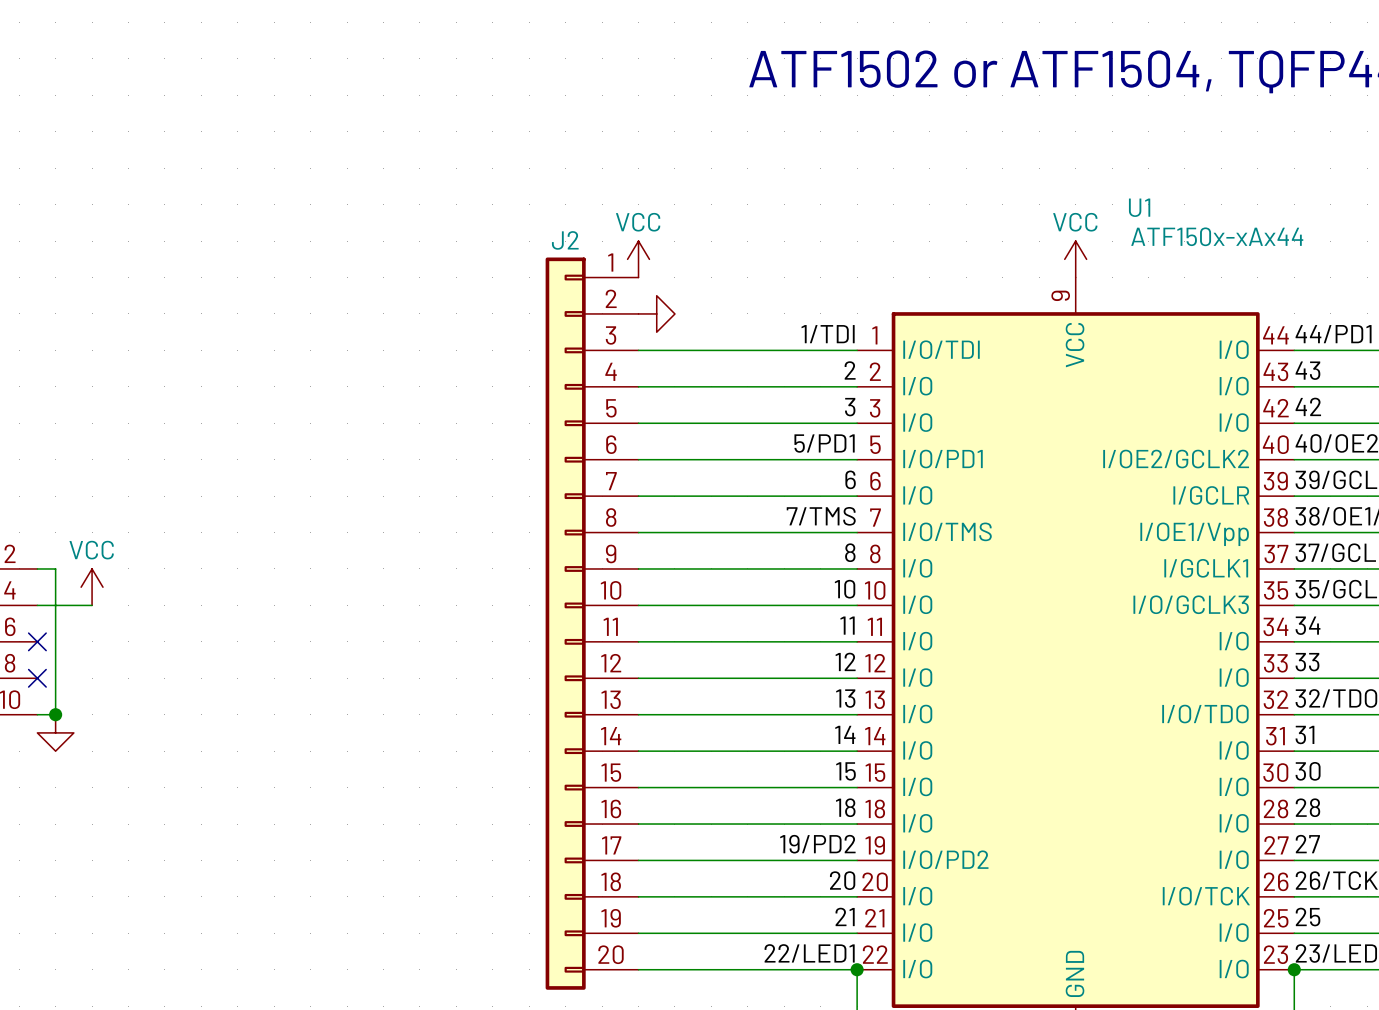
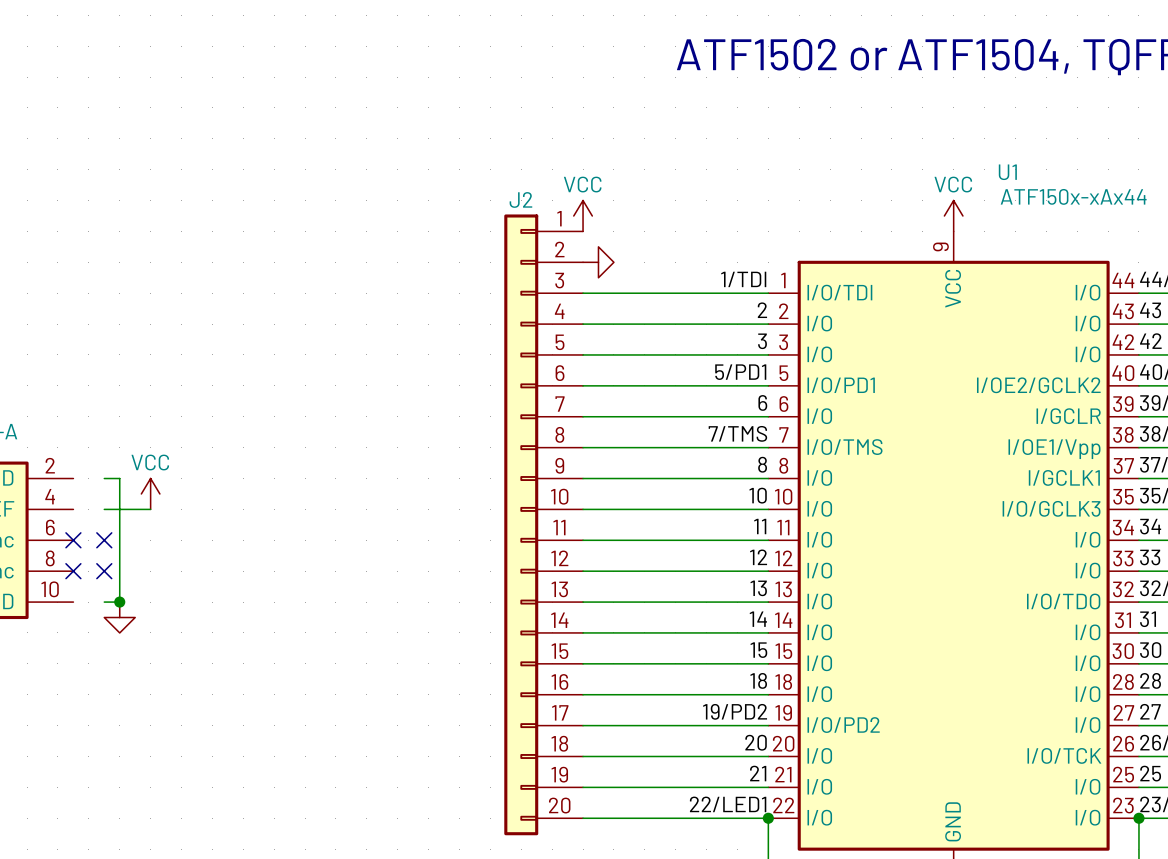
wire: (37, 568) (55, 568) (55, 714) (37, 714) -> (104, 478) (119, 478) (119, 602) (104, 602)
power symbol position: VCC (92, 587) -> VCC (150, 493)
wire: (37, 605) (73, 605) -> (119, 509) (150, 509)
no-connect mark: none -> (104, 540)
no-connect mark: none -> (104, 571)
junction position: (55, 714) -> (119, 602)
power symbol position: (55, 732) -> (119, 617)

